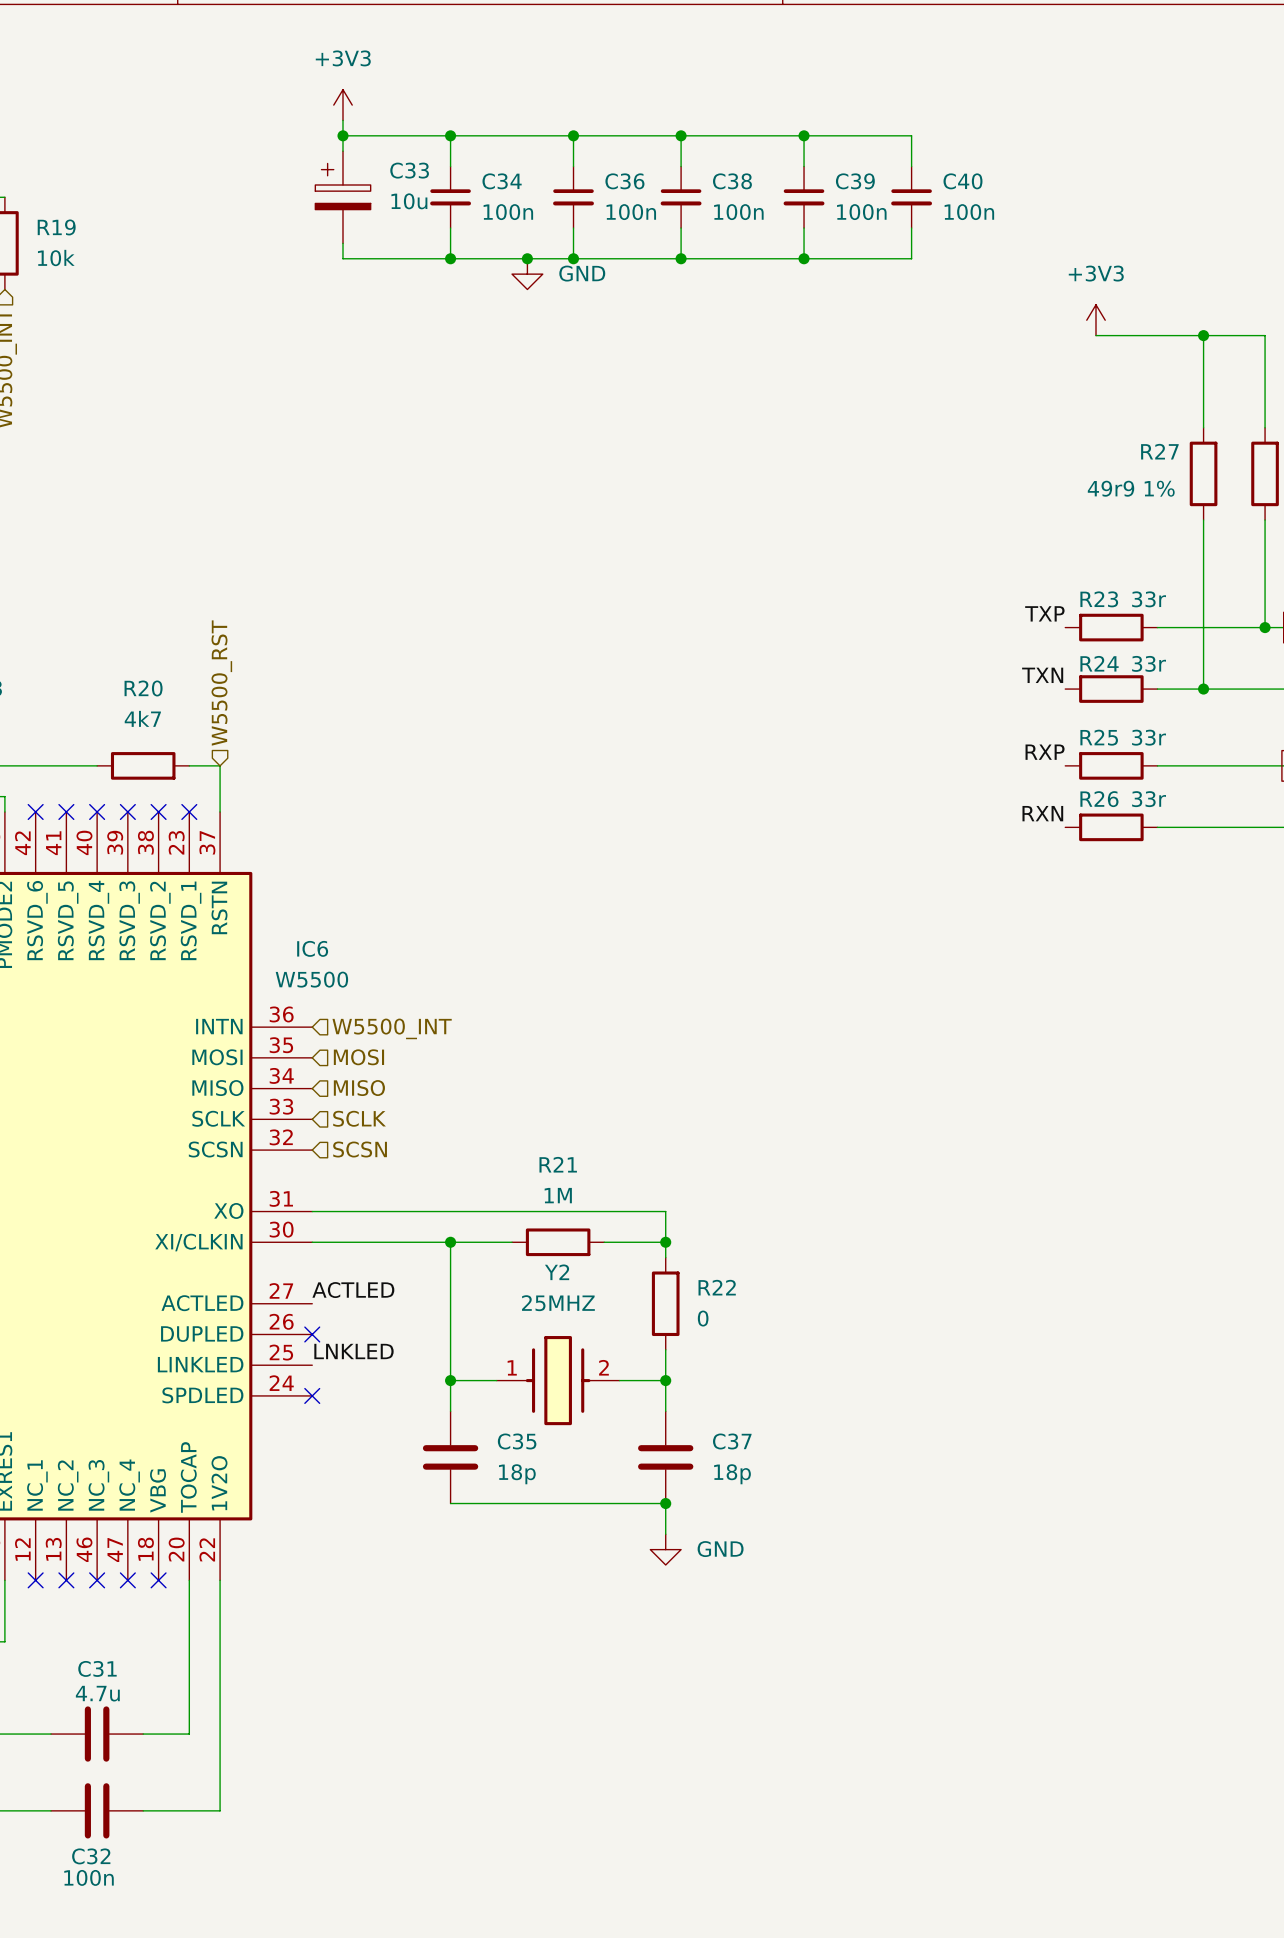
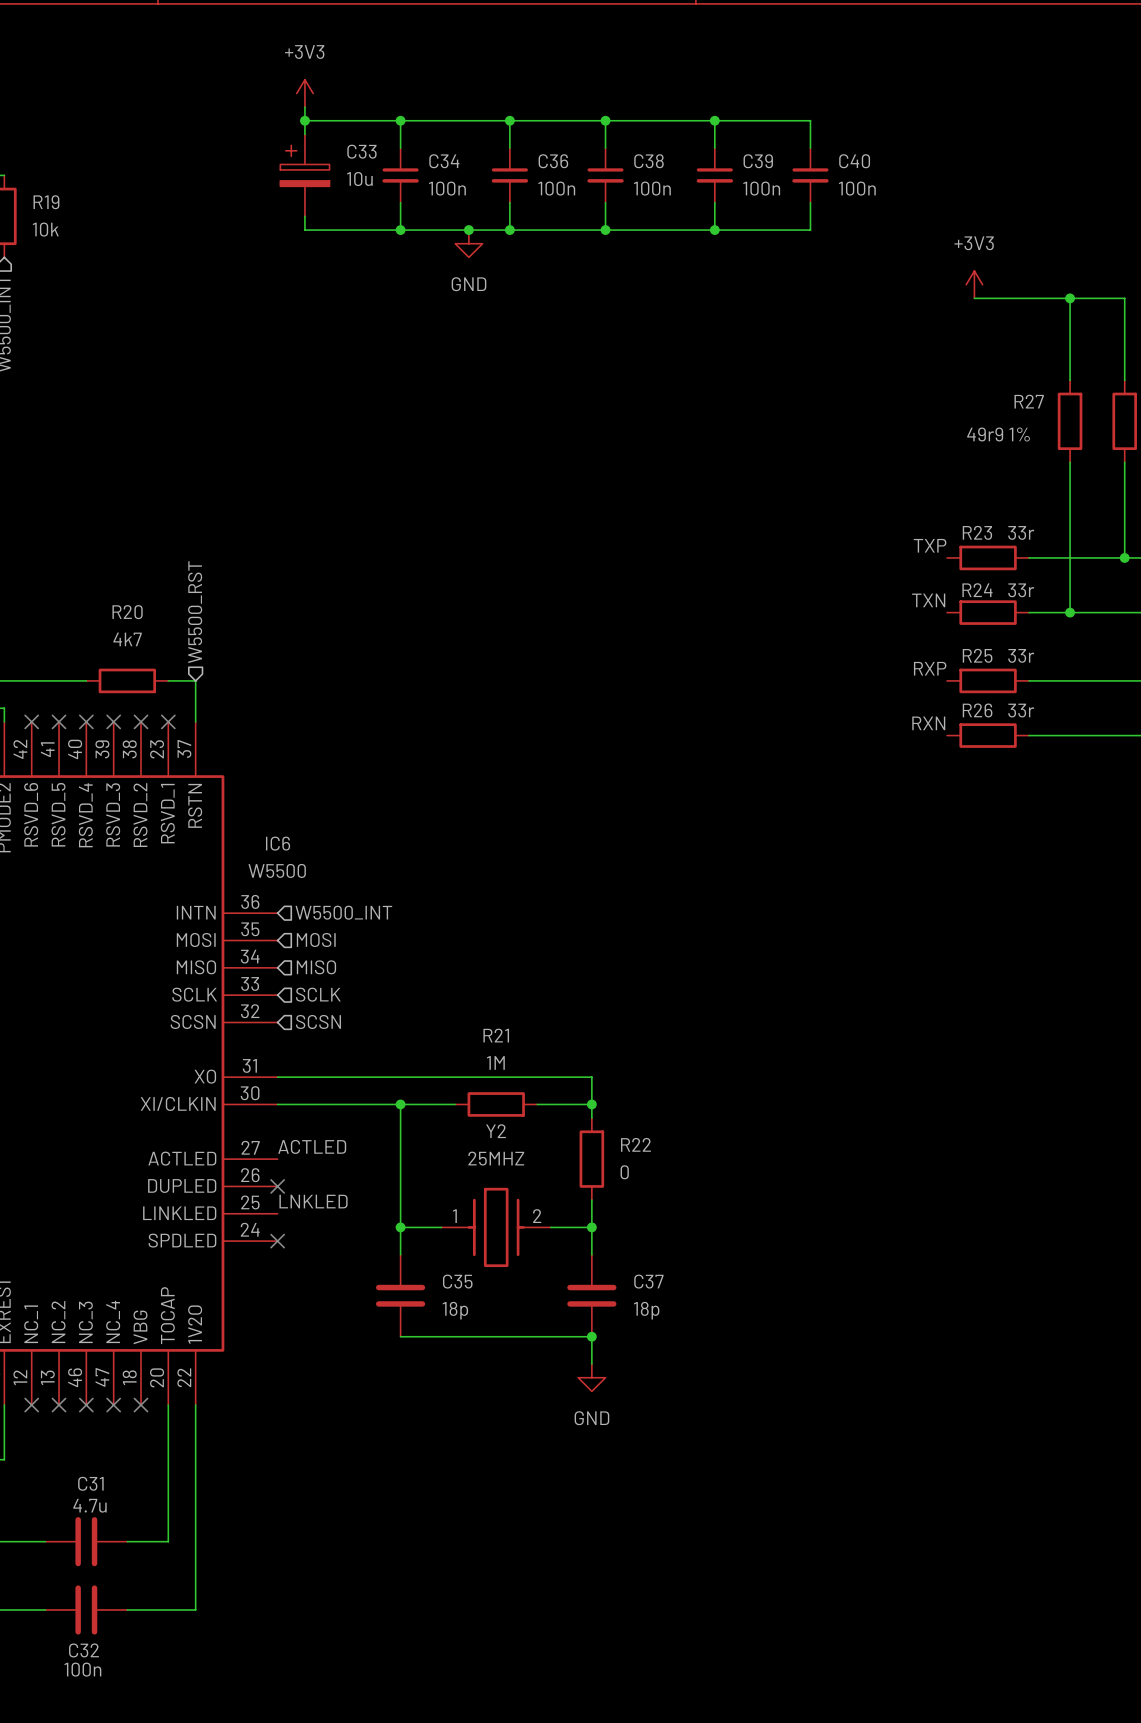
power symbol text position: GND (582, 273) -> GND (468, 284)
power symbol text position: GND (720, 1549) -> GND (591, 1418)

